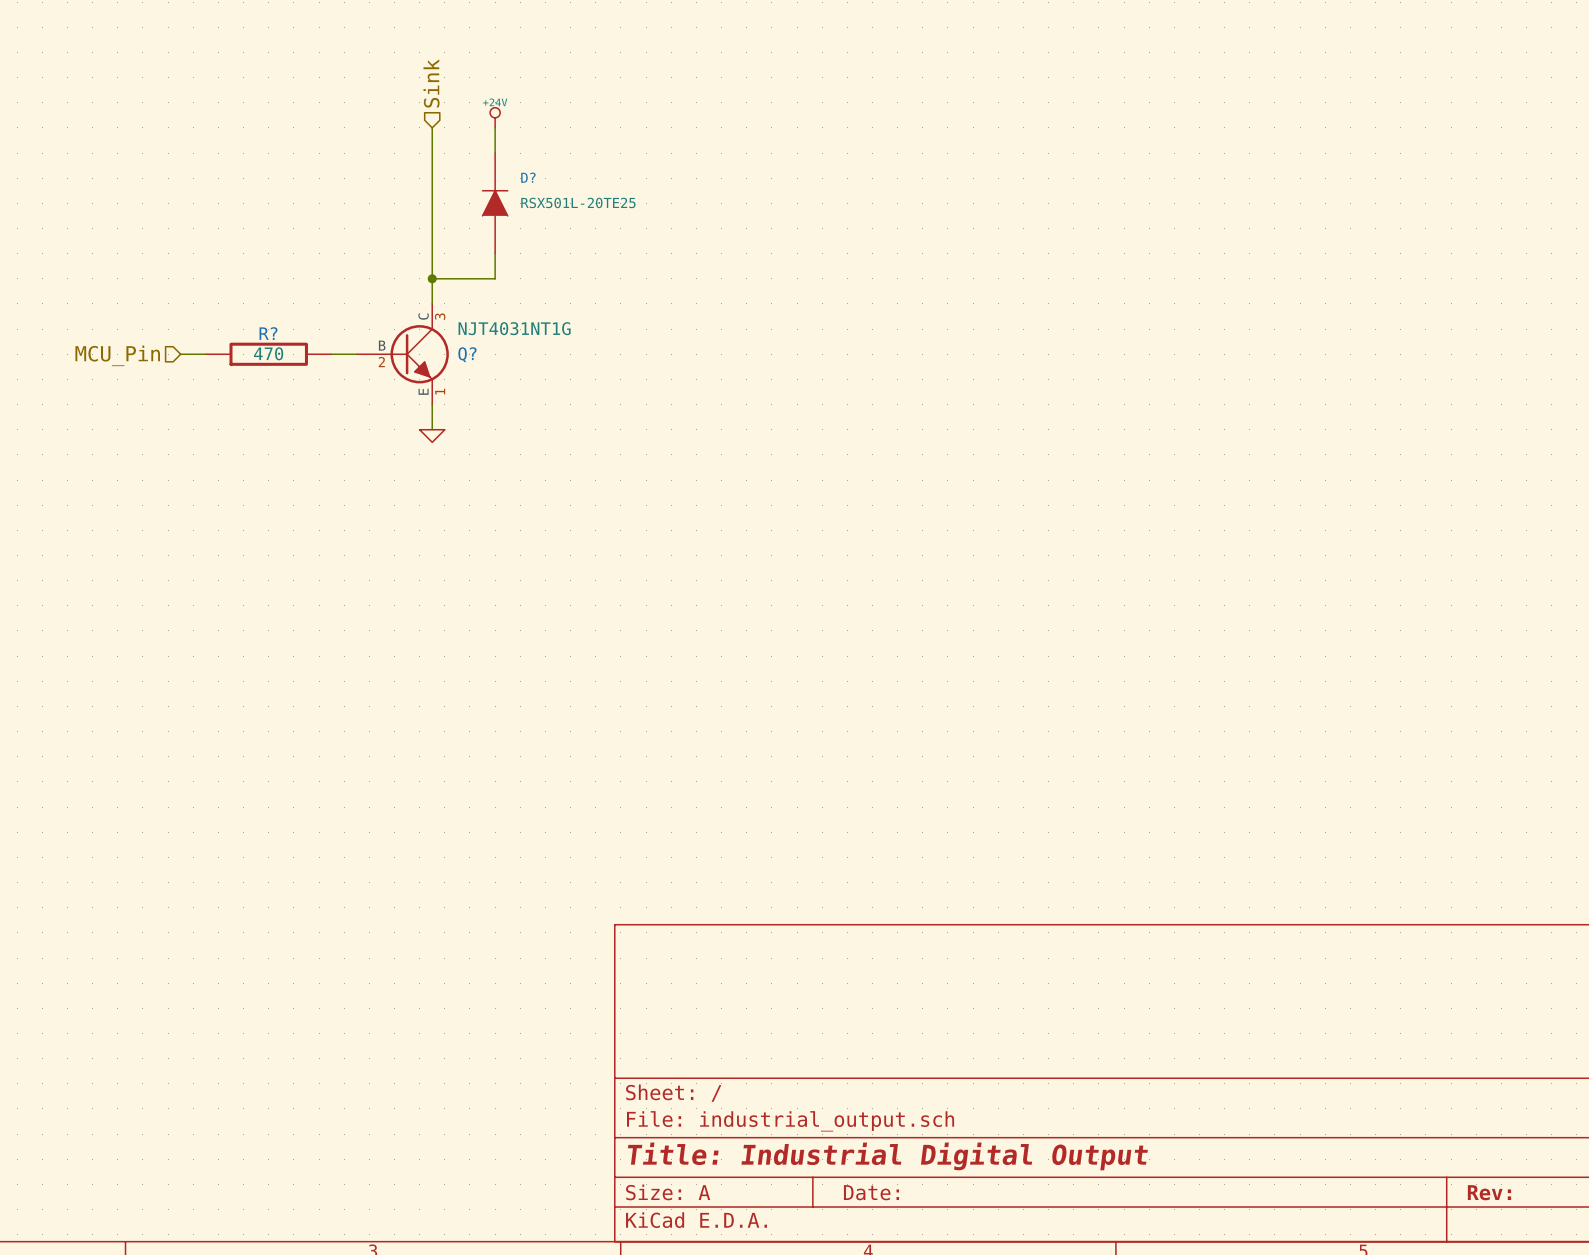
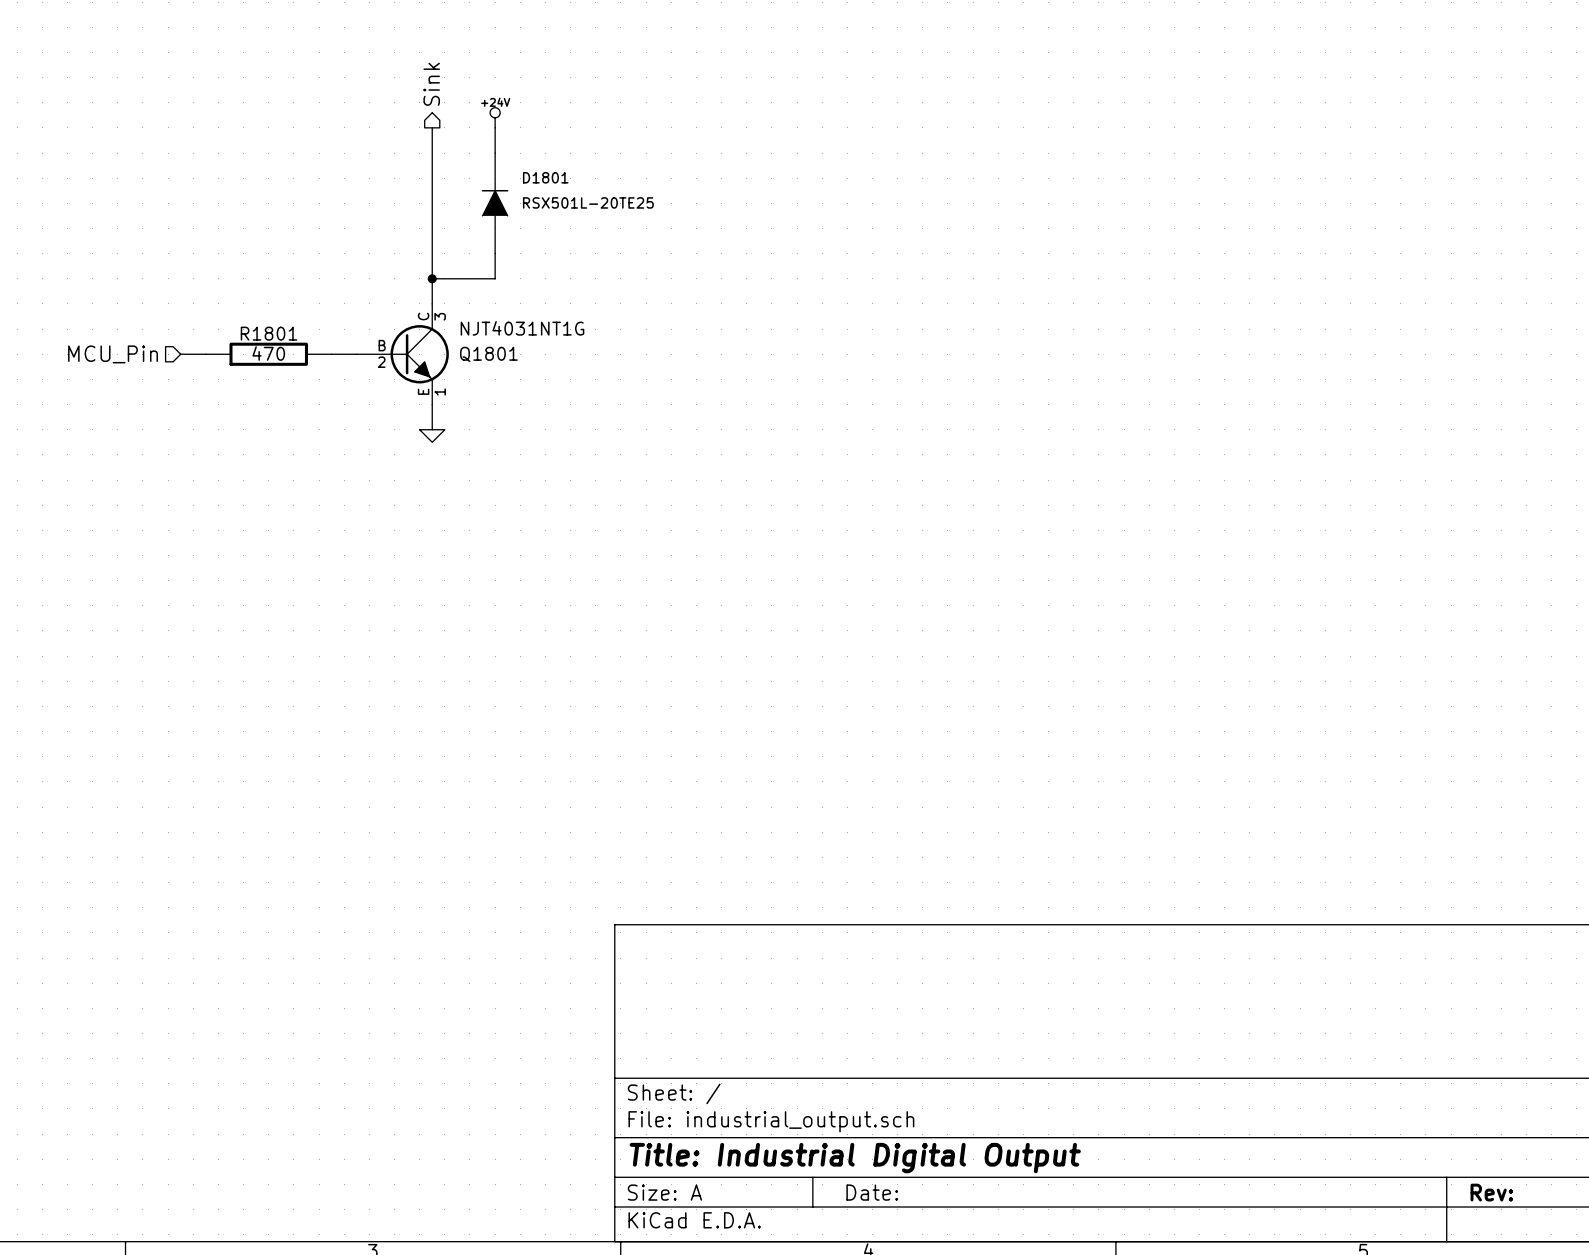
hierarchical label shape: input (431, 83) -> output (431, 84)
D? name: D? (528, 177) -> D1801 (545, 177)
R? name: R? (268, 333) -> R1801 (269, 333)
Q? name: Q? (467, 354) -> Q1801 (488, 354)

